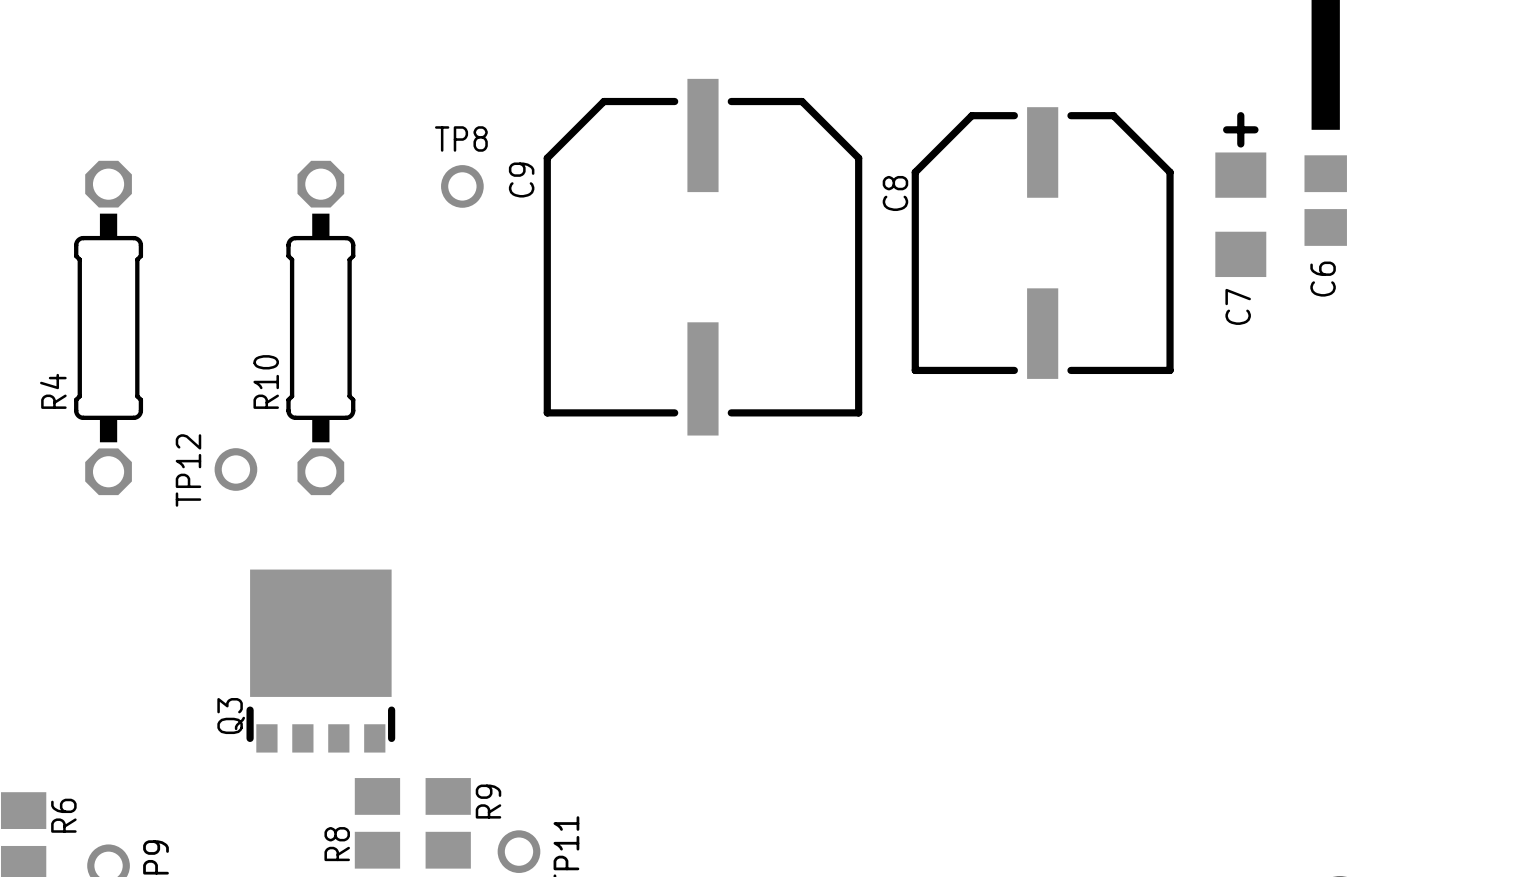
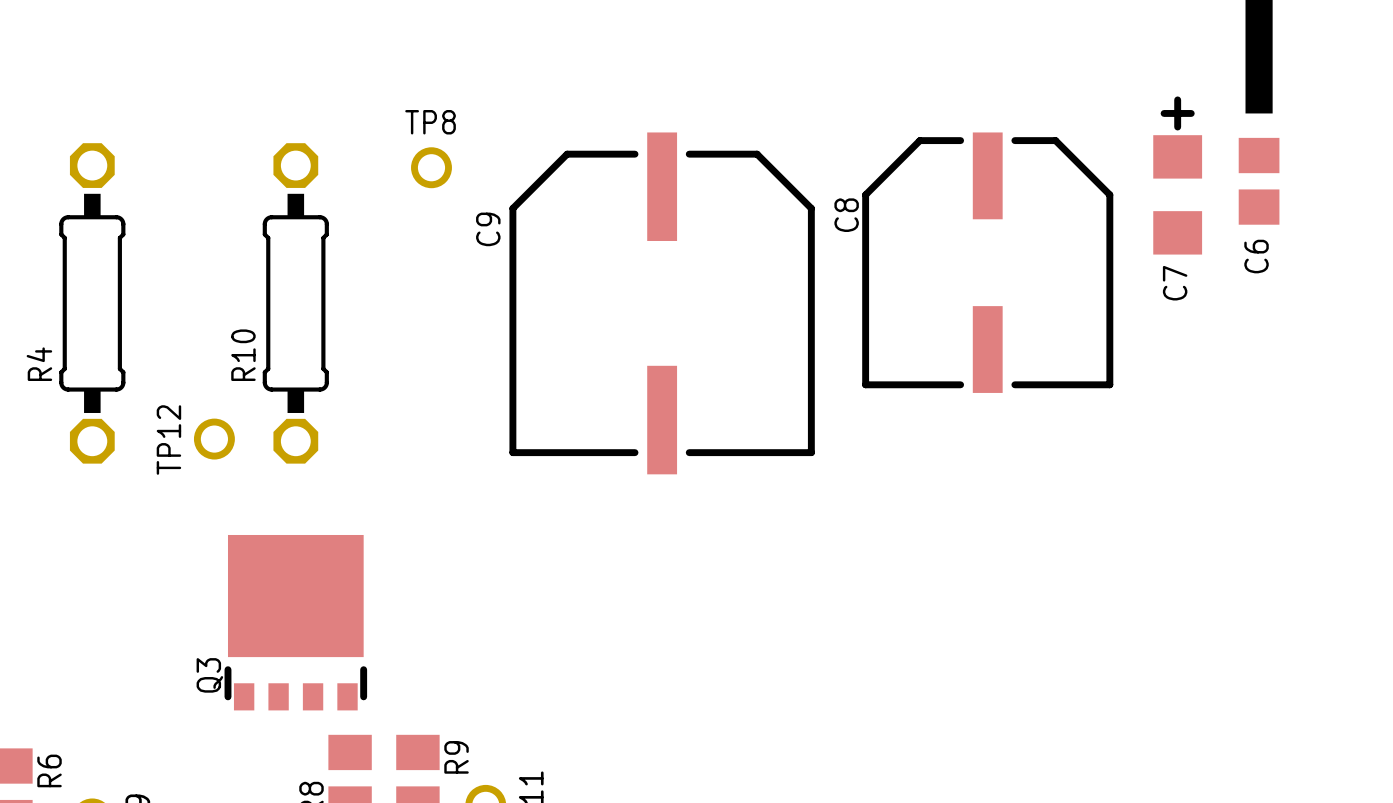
C8 position: (1042, 243) -> (987, 262)
C9 position: (702, 257) -> (662, 303)

